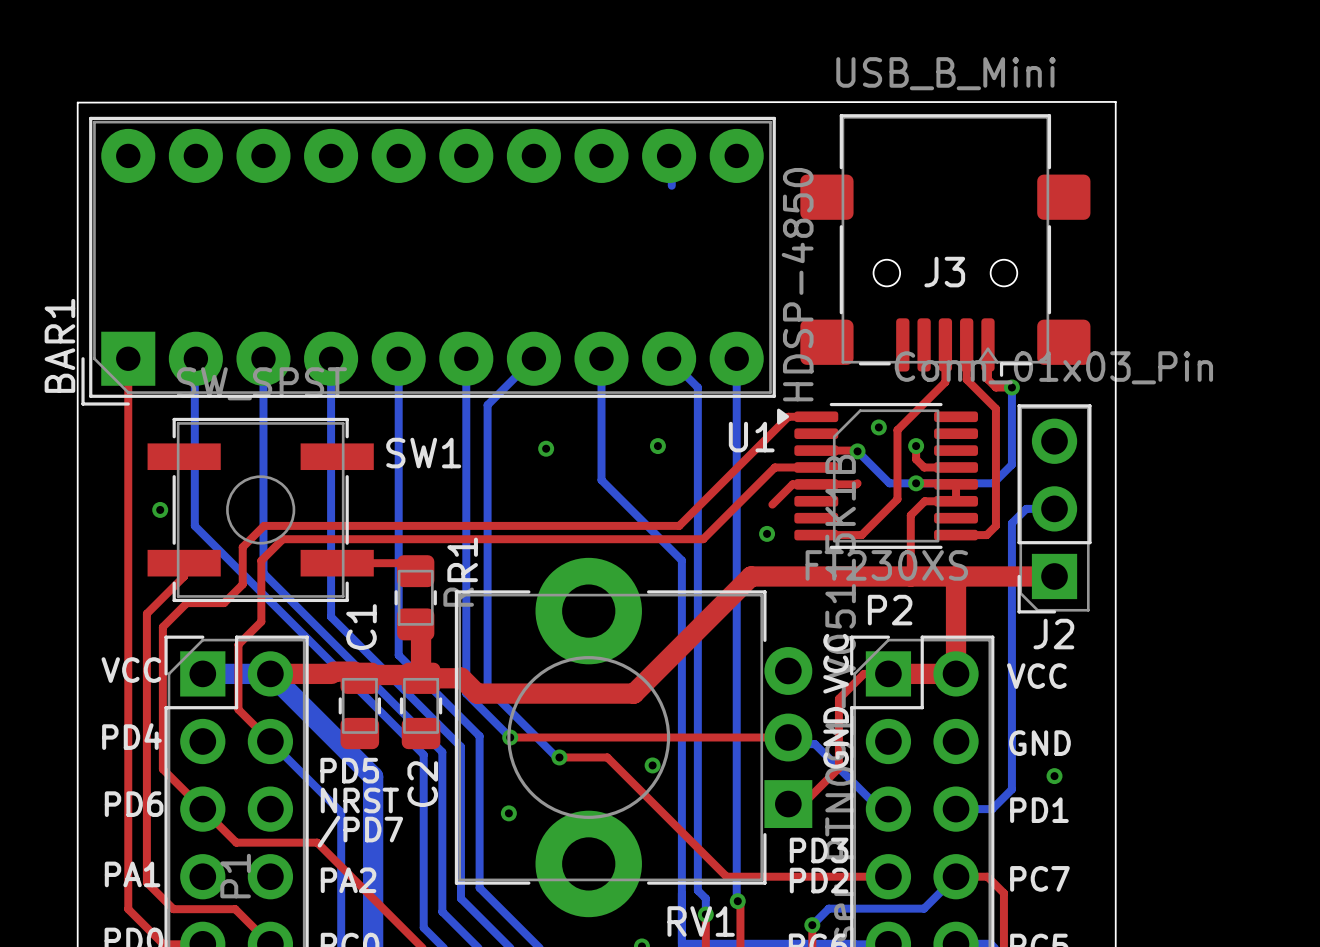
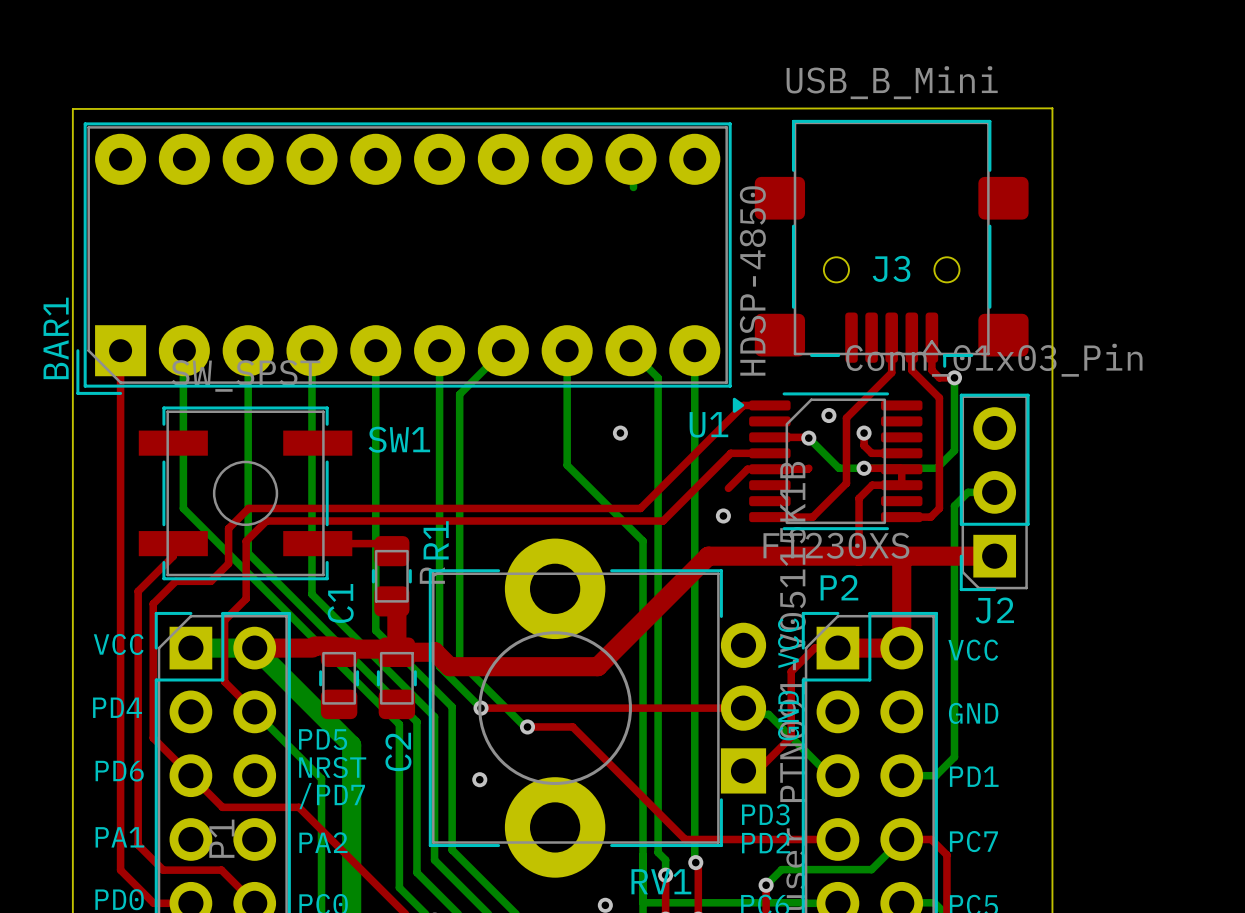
via: (546, 448) -> none
via: (160, 509) -> none
via: (652, 765) -> none
via: (1054, 776) -> none

